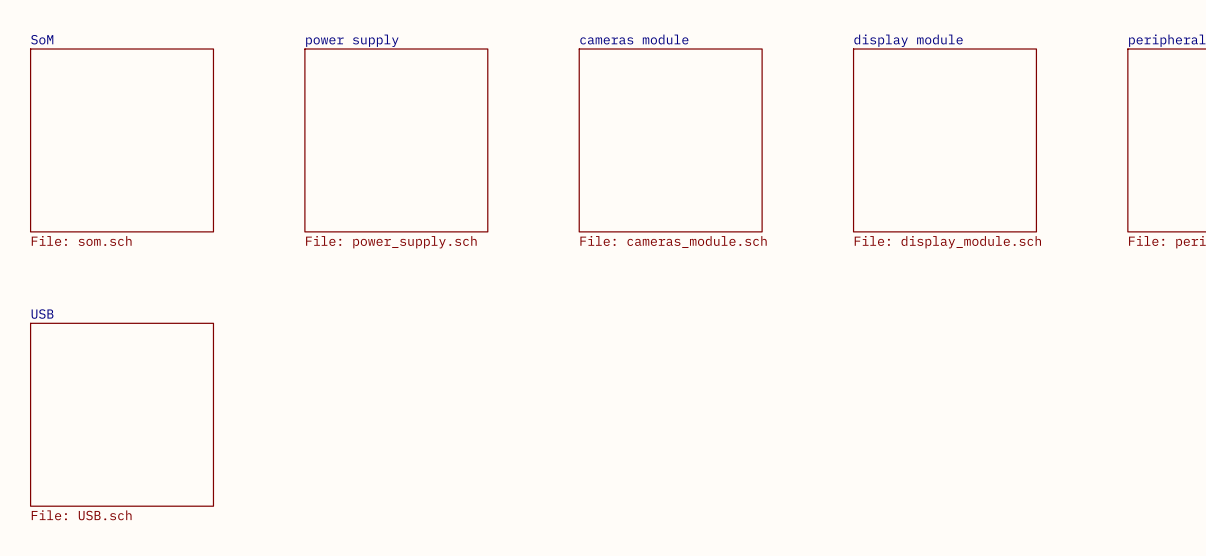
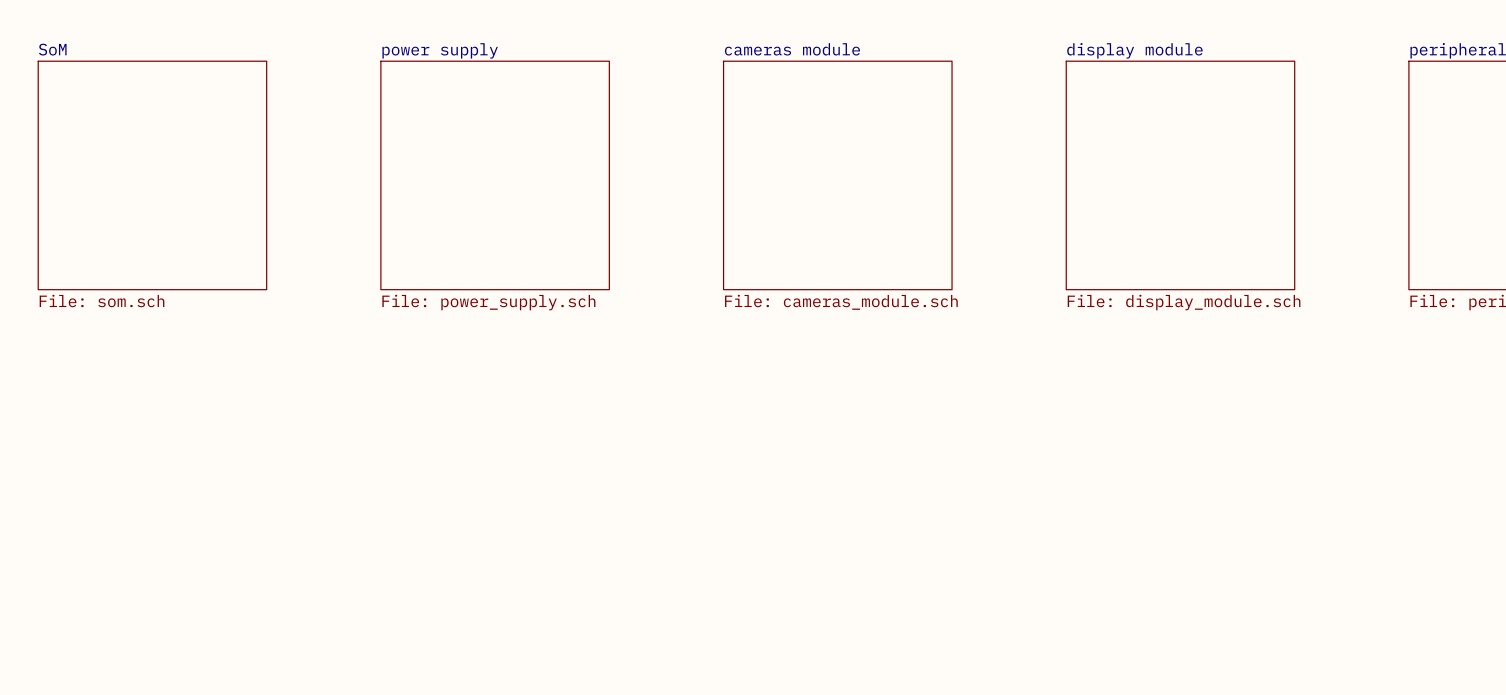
sheet USB: File: USB.sch (122, 414) -> none

